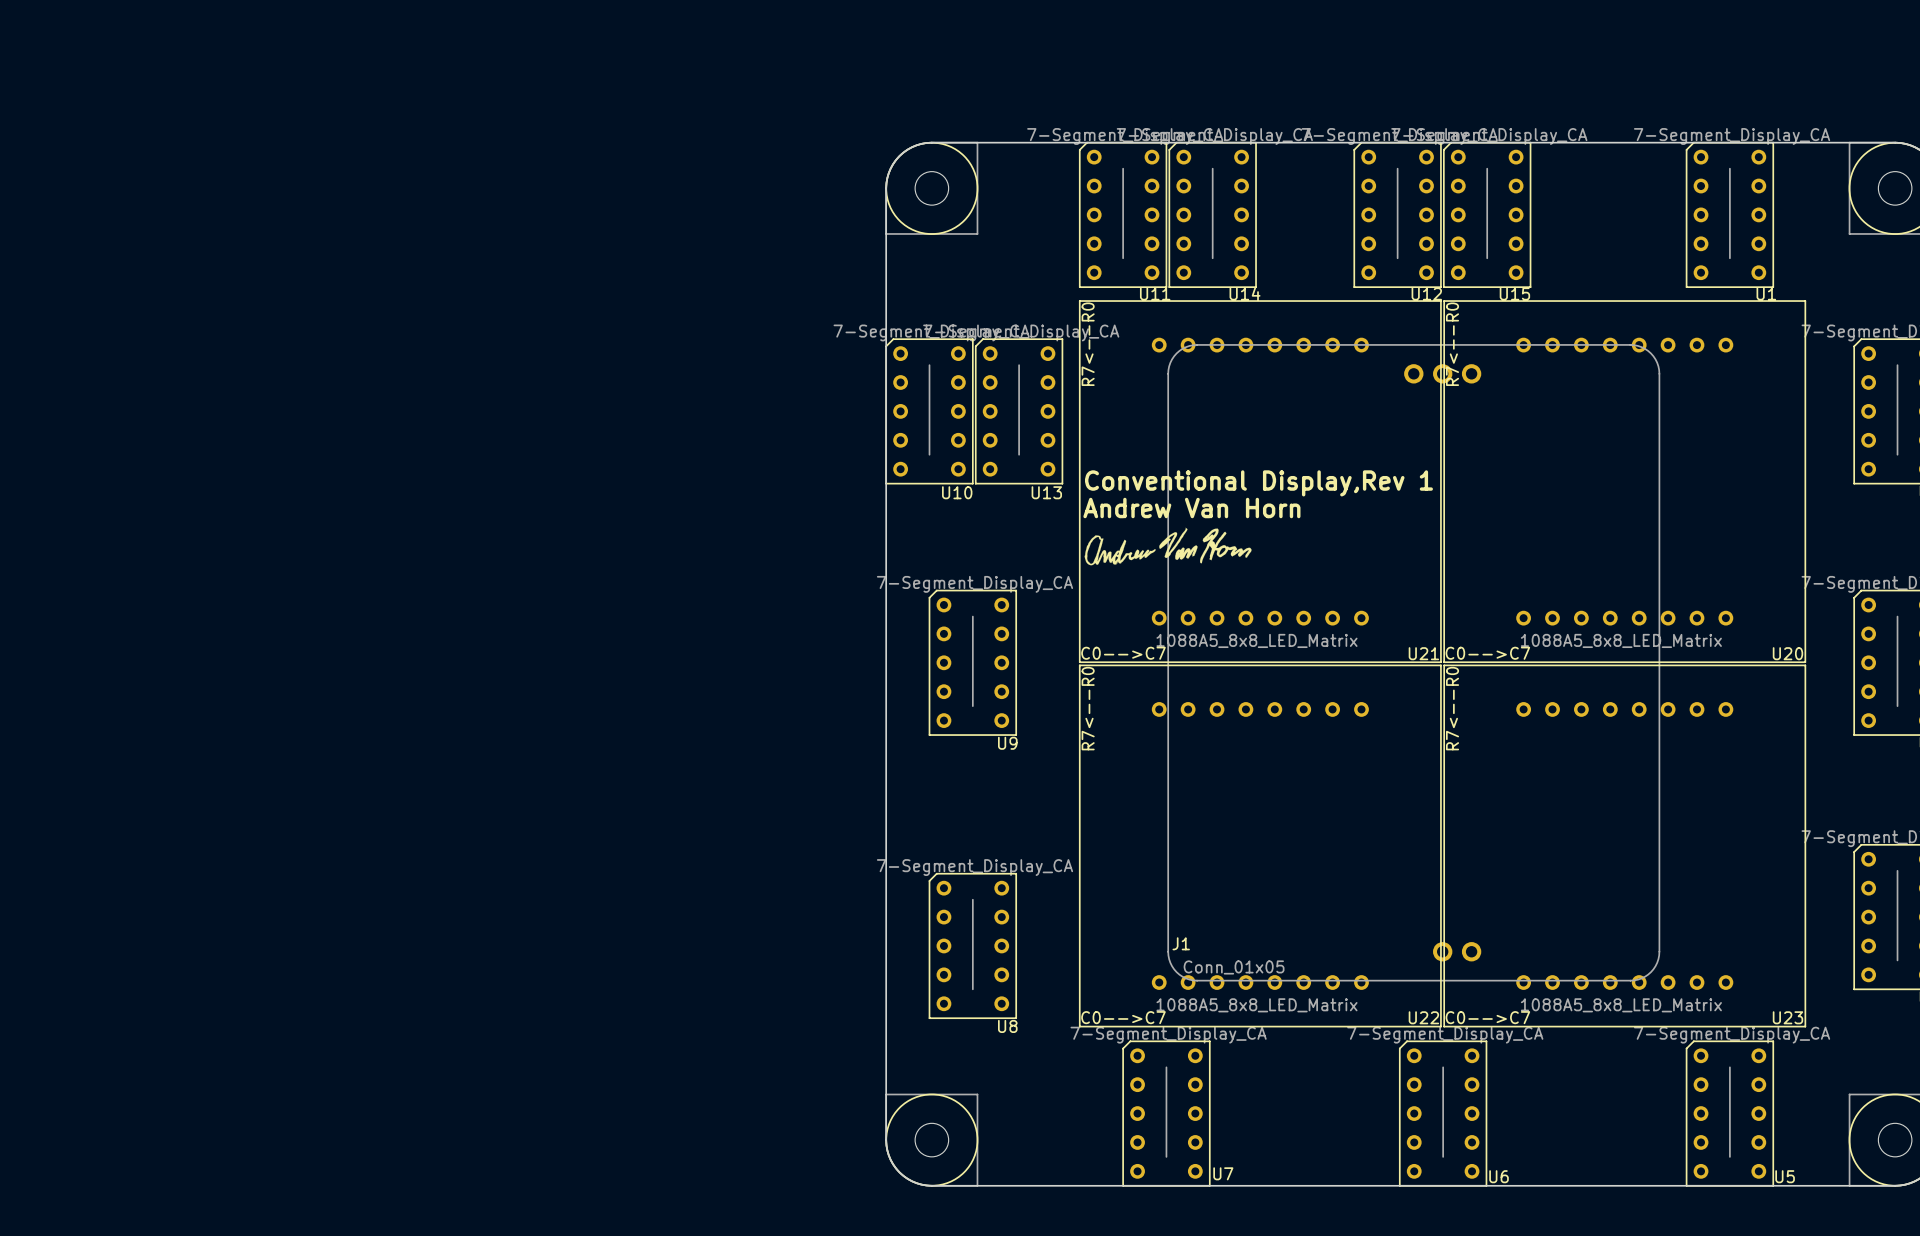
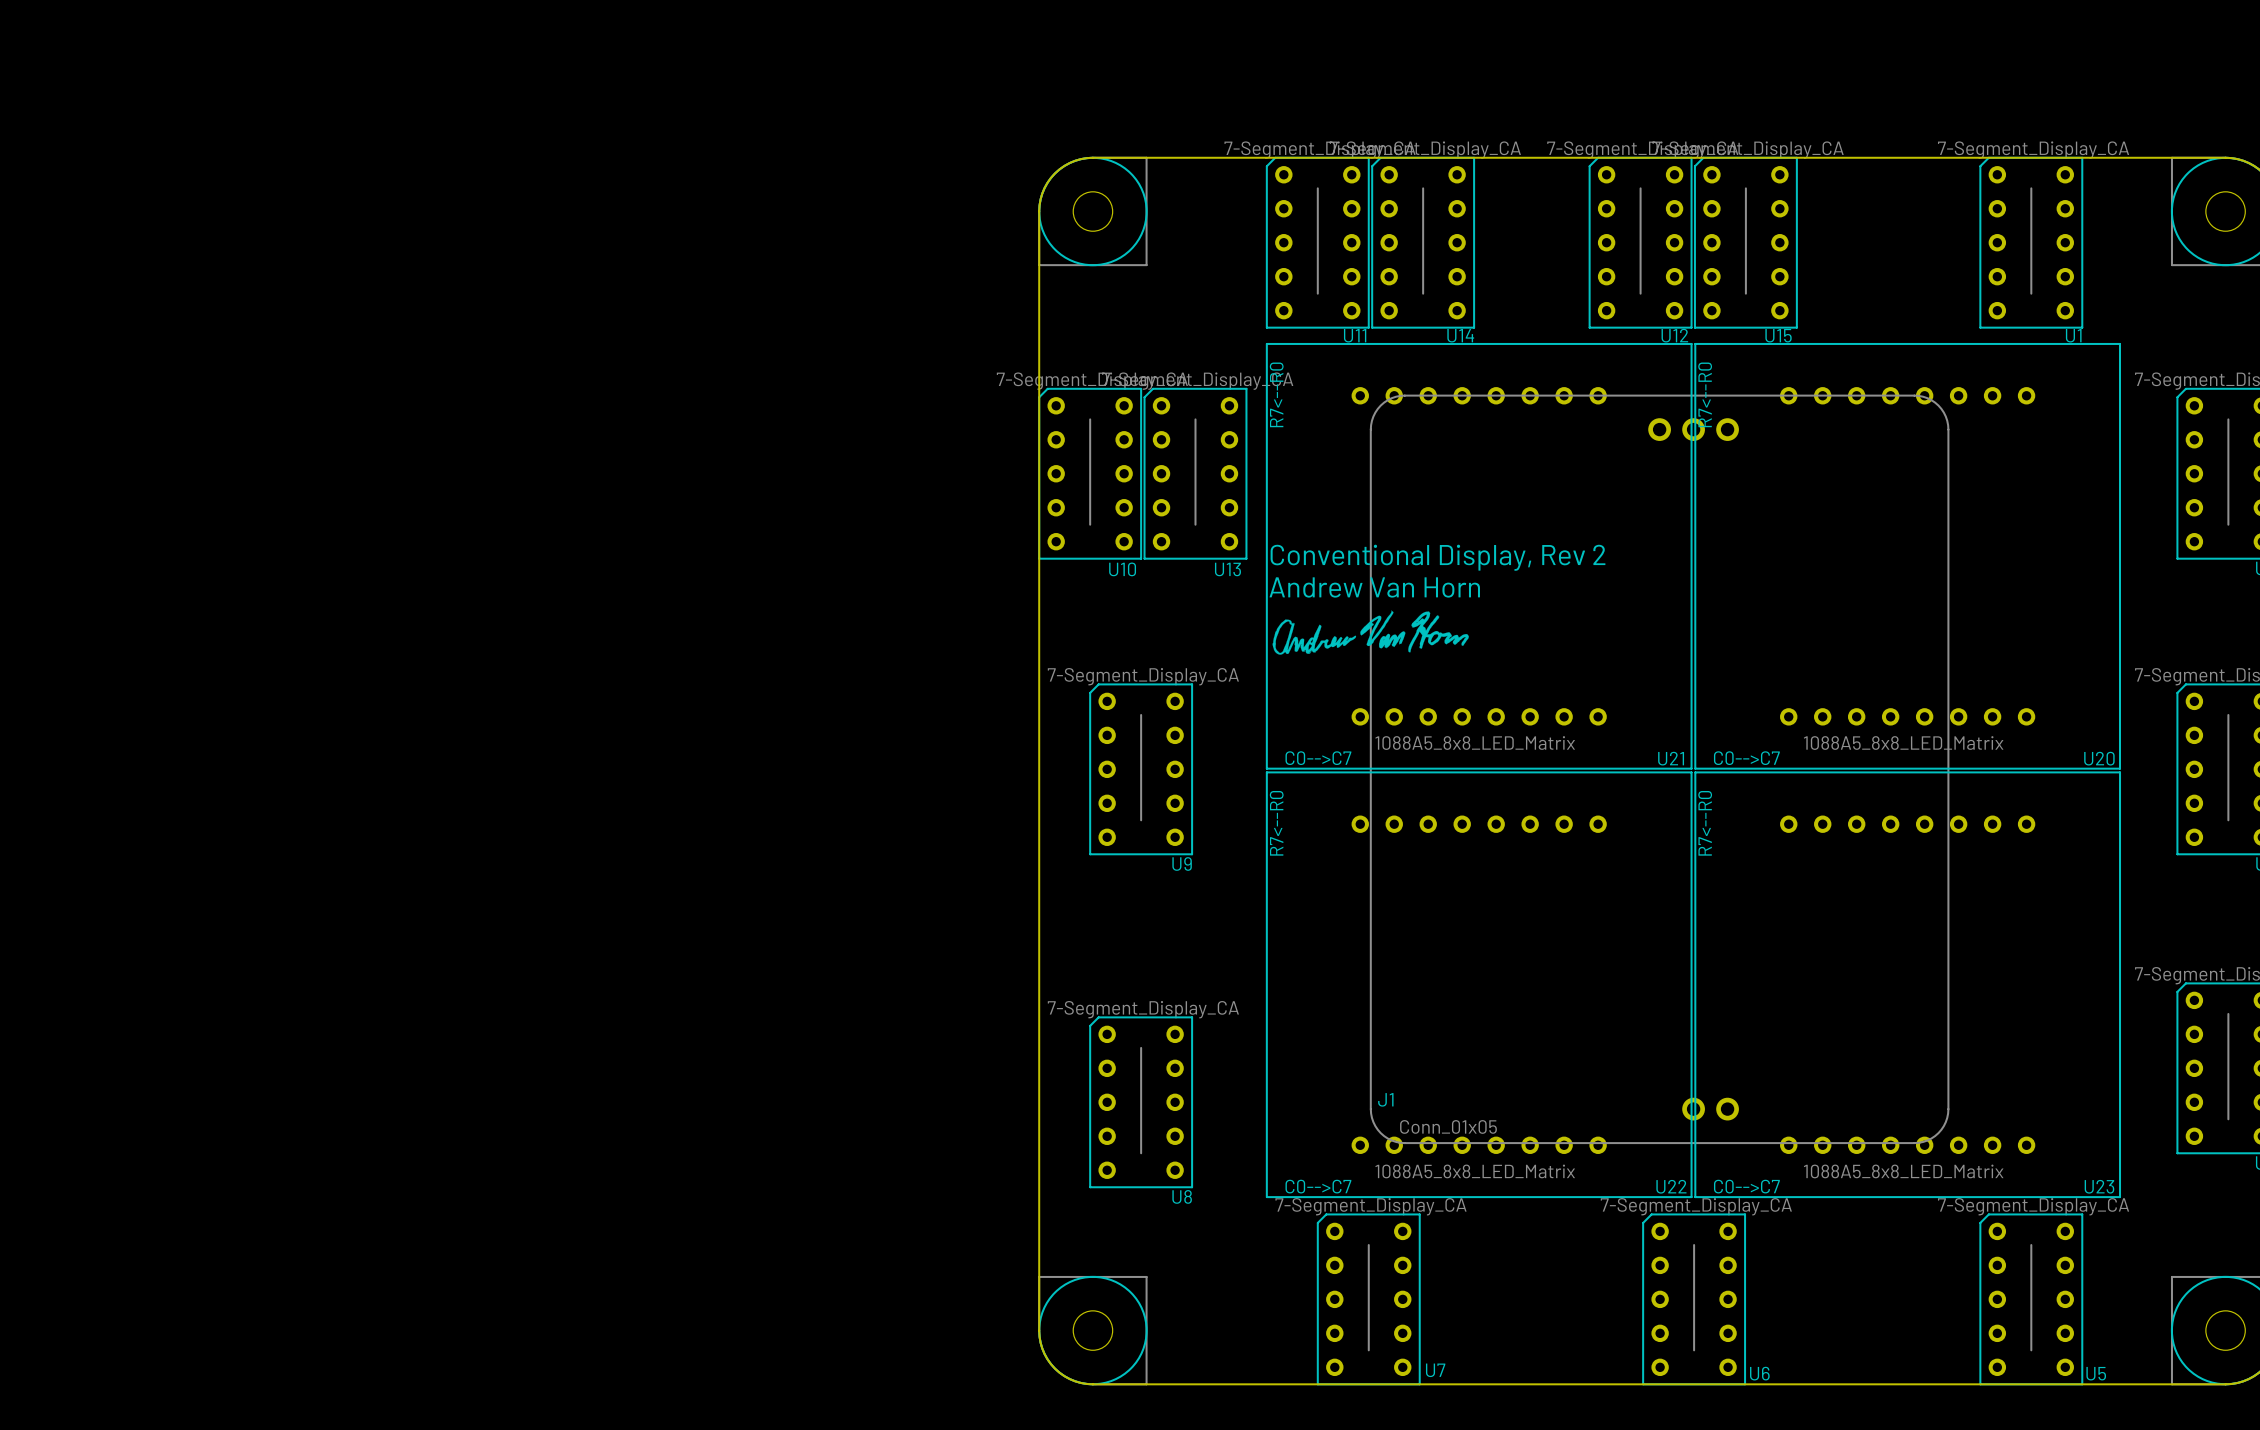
text: Conventional Display,Rev 1 (1258, 483) -> Conventional Display, Rev 2 (1438, 557)

